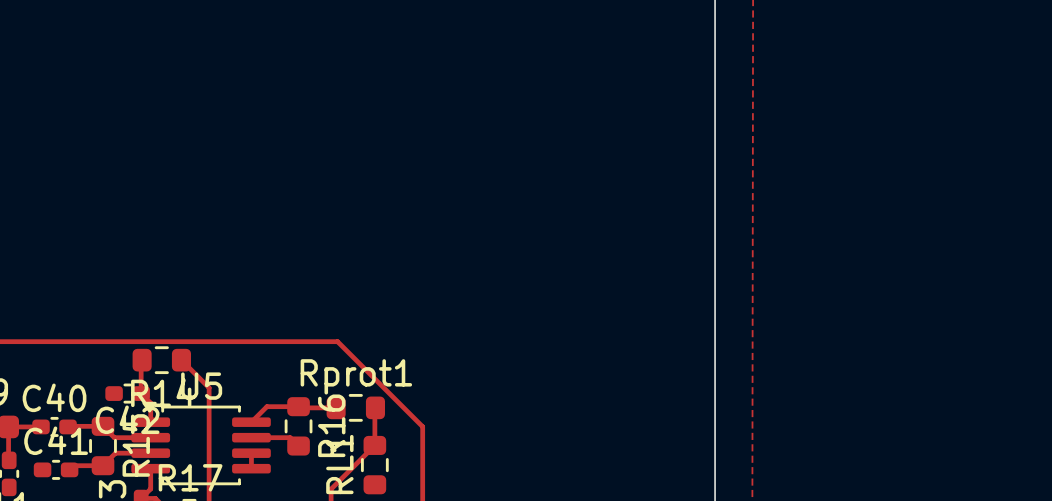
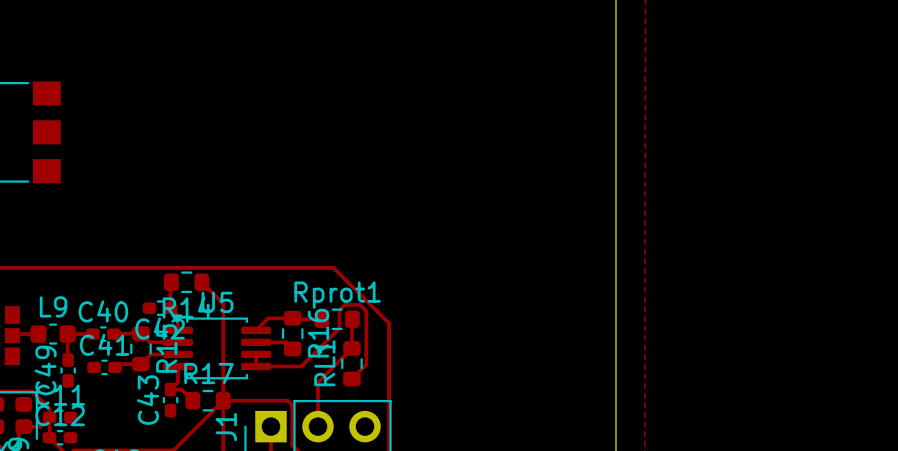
track: (337, 341) (385, 389) -> (323, 267) (333, 267) (389, 323) (389, 333)
track: none -> (360, 304) (344, 304) (339, 310) (339, 328) (301, 366) (256, 366)
track: (393, 397) (422, 426) -> (366, 311) (366, 364) (351, 378)

